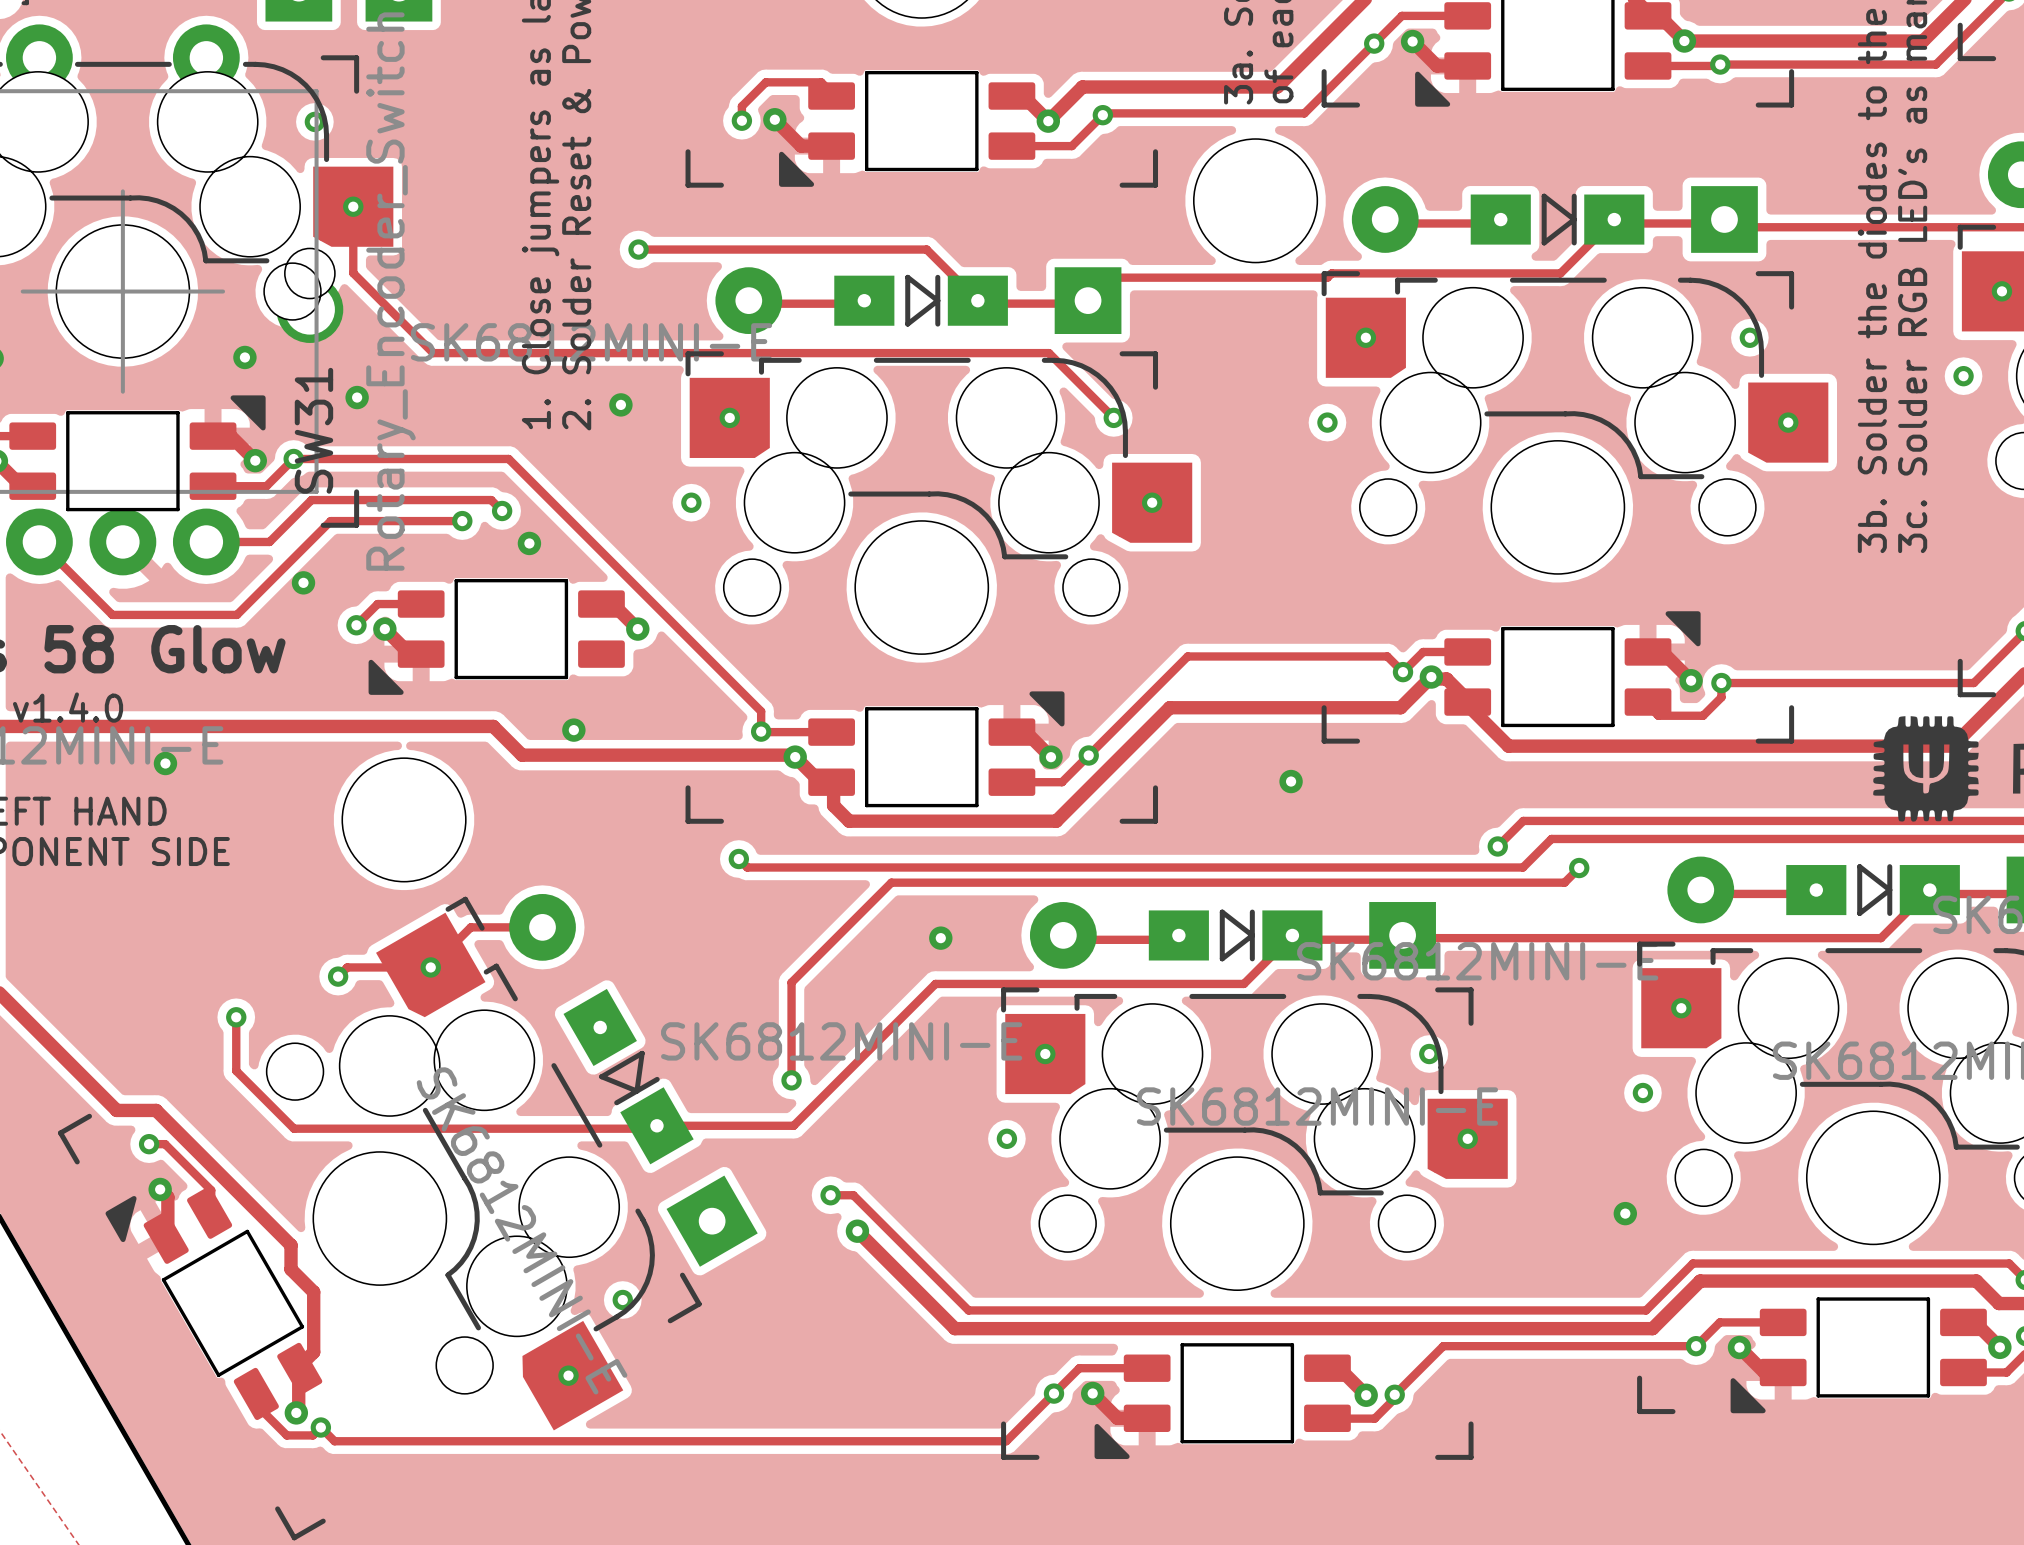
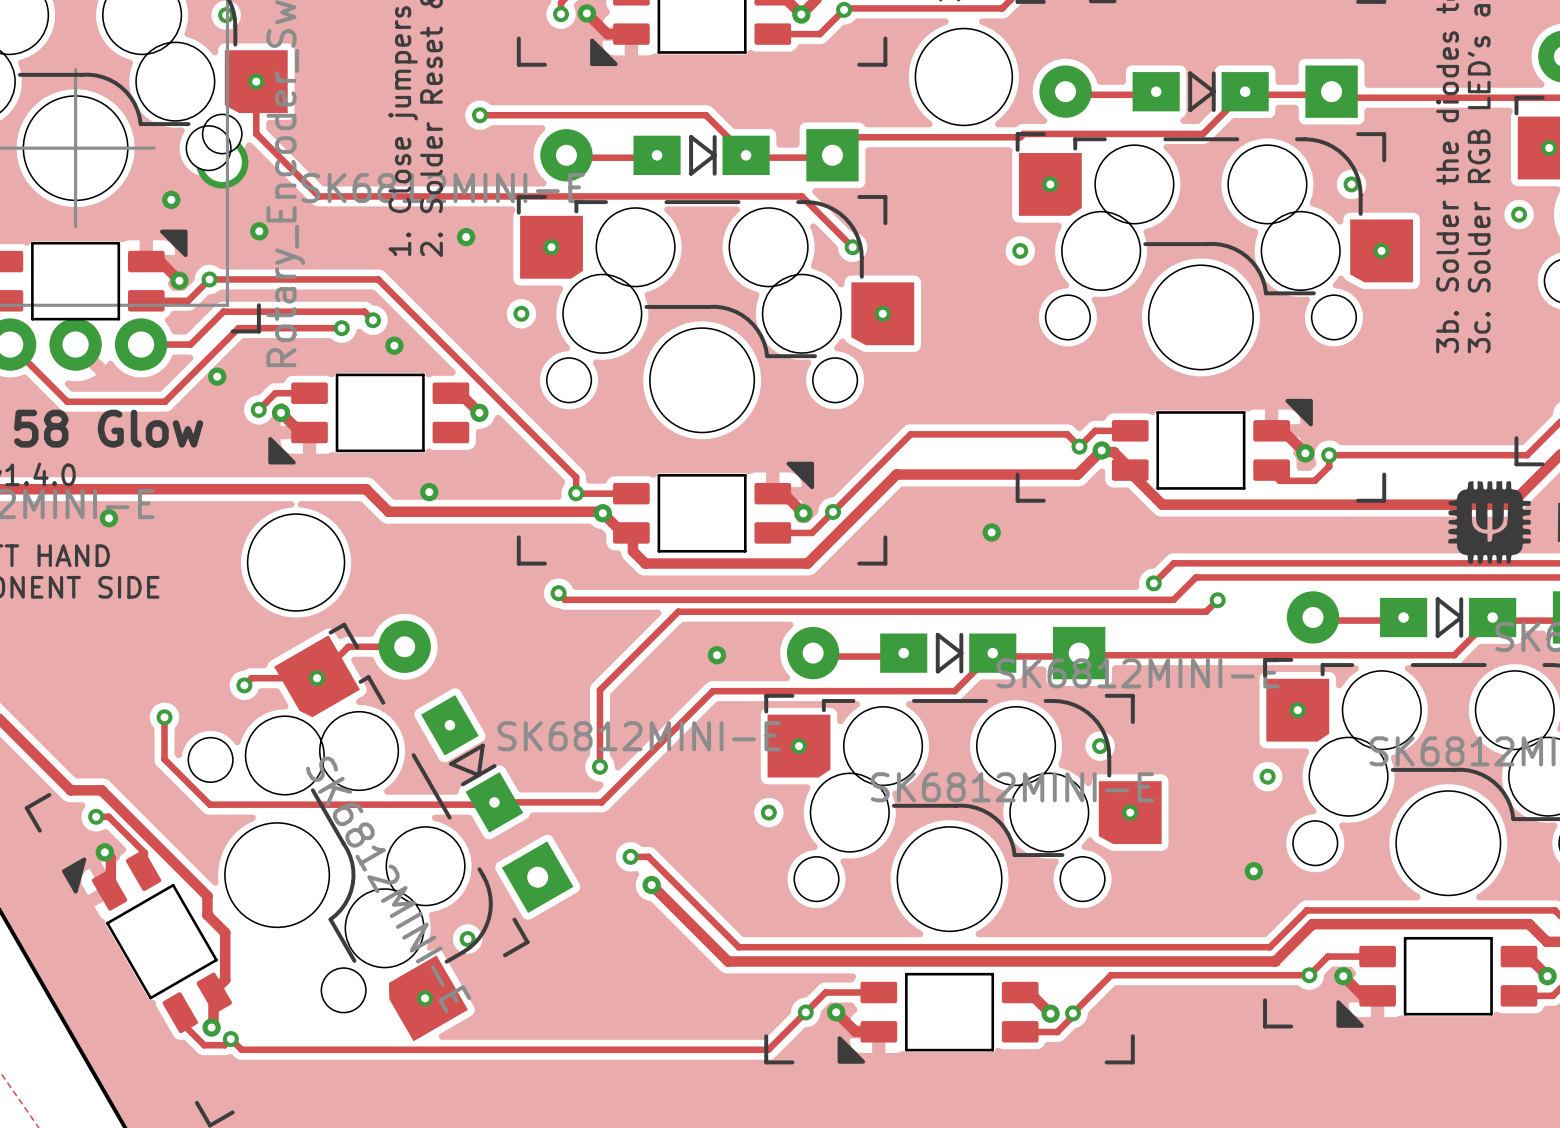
SW31 name: SW31 (313, 430) -> none

